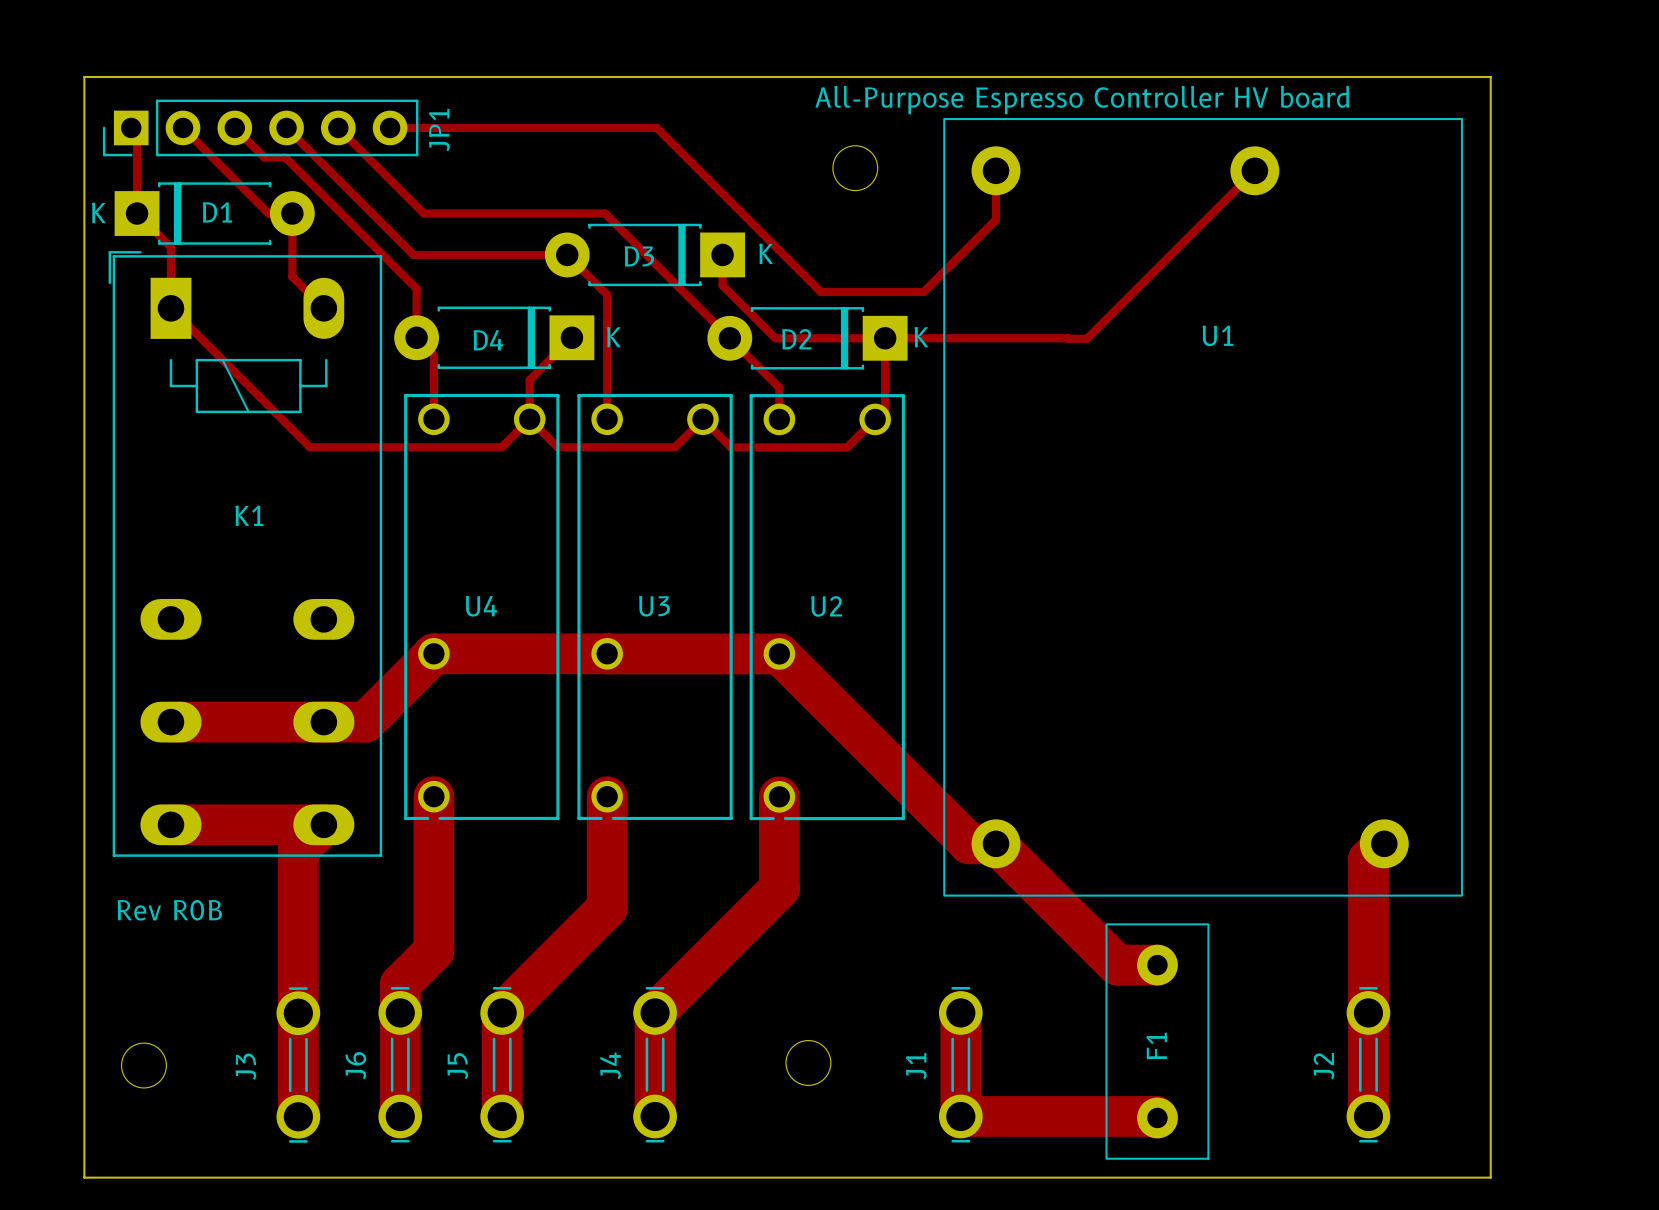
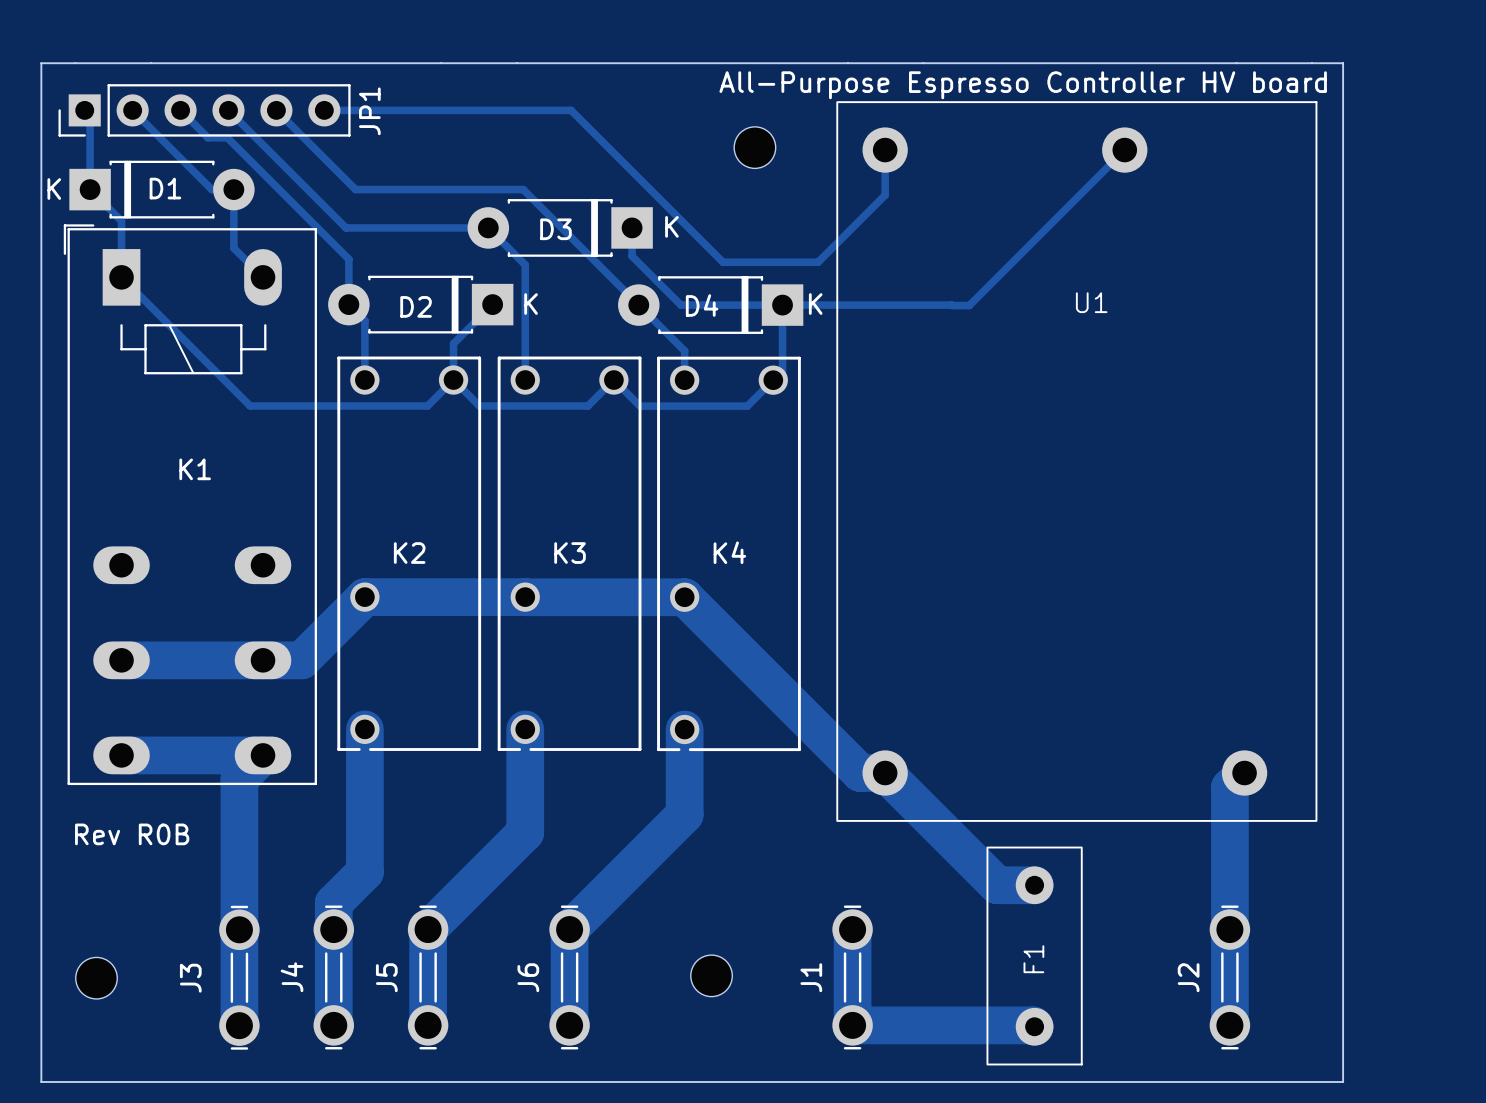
D2 name: D2 (796, 339) -> D4 (702, 305)
D4 name: D4 (488, 340) -> D2 (416, 306)
U4 name: U4 (481, 606) -> K2 (409, 553)
U3 name: U3 (654, 606) -> K3 (570, 553)
U2 name: U2 (826, 606) -> K4 (729, 552)
J6 name: J6 (355, 1065) -> J4 (292, 977)
J4 name: J4 (610, 1065) -> J6 (528, 977)

